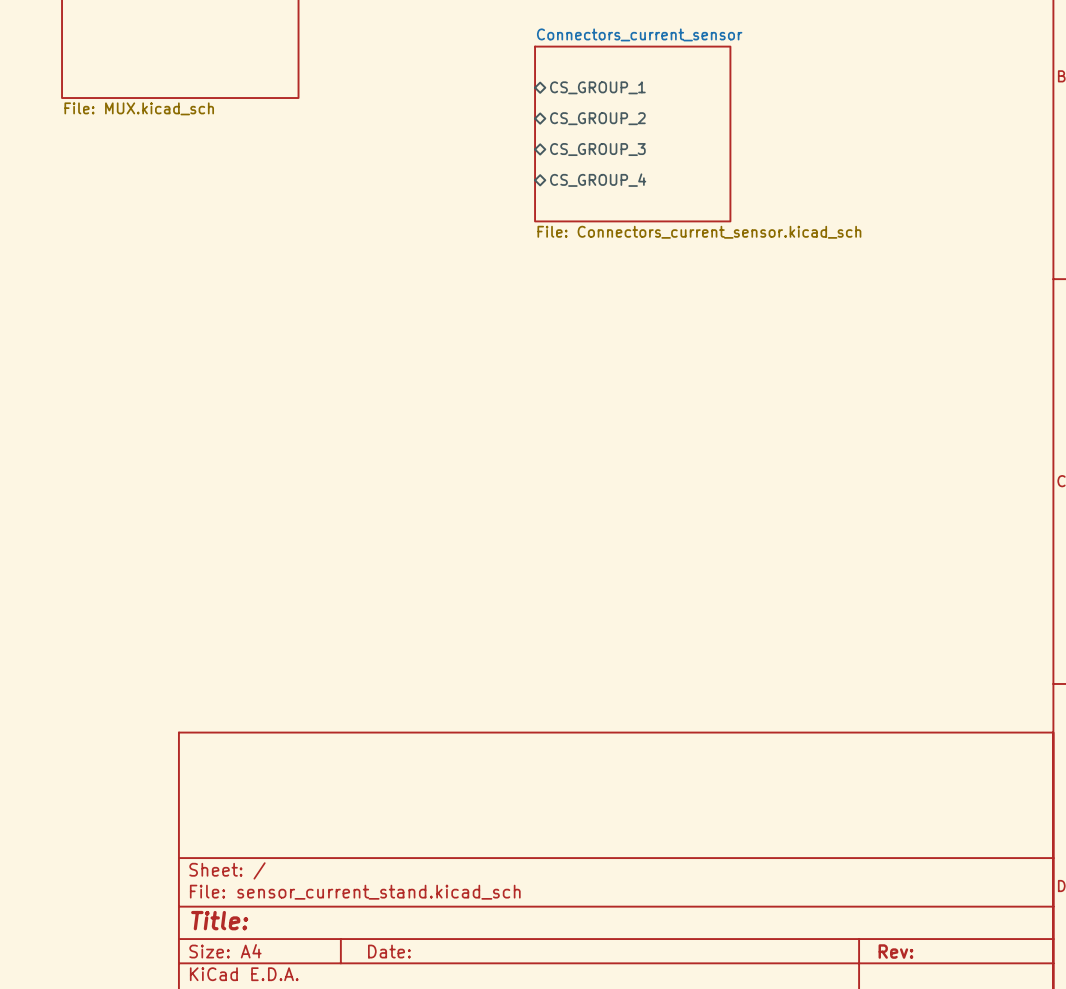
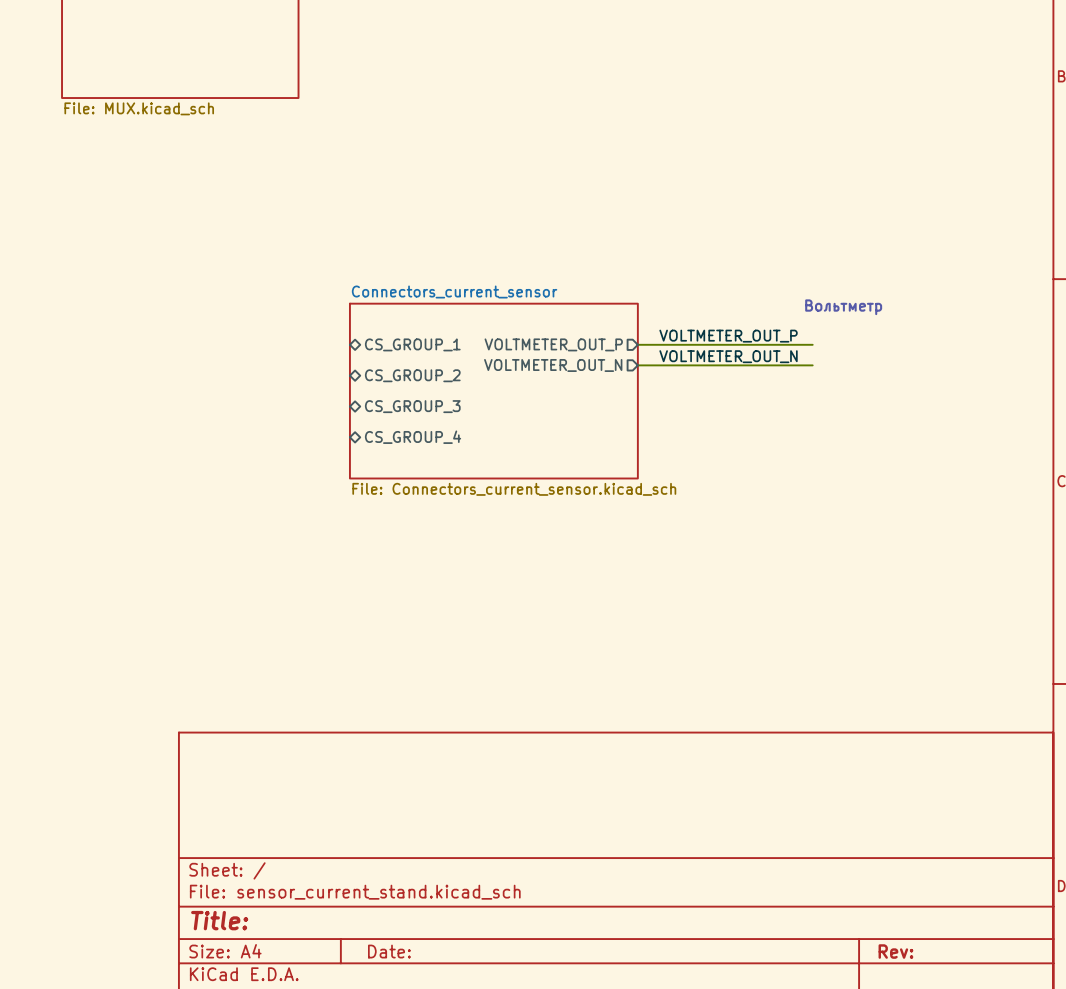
sheet pin: CS_GROUP_1 (597, 87) -> none
sheet pin: CS_GROUP_2 (597, 118) -> none
sheet Connectors_current_sensor: File: Connectors_current_sensor.kicad_sch (632, 134) -> none
sheet pin: CS_GROUP_3 (597, 149) -> none
sheet pin: CS_GROUP_4 (598, 180) -> none
text: none -> Вольтметр (843, 307)
label: none -> VOLTMETER_OUT_P (728, 336)
sheet pin: none -> CS_GROUP_1 (412, 344)
sheet pin: none -> VOLTMETER_OUT_P (553, 344)
wire: none -> (637, 344) (812, 344)
label: none -> VOLTMETER_OUT_N (728, 356)
sheet pin: none -> VOLTMETER_OUT_N (553, 365)
wire: none -> (637, 365) (812, 365)
sheet pin: none -> CS_GROUP_2 (412, 375)
sheet Connectors_current_sensor: none -> File: Connectors_current_sensor.kicad_sch (493, 391)
sheet pin: none -> CS_GROUP_3 (412, 406)
sheet pin: none -> CS_GROUP_4 (413, 437)

